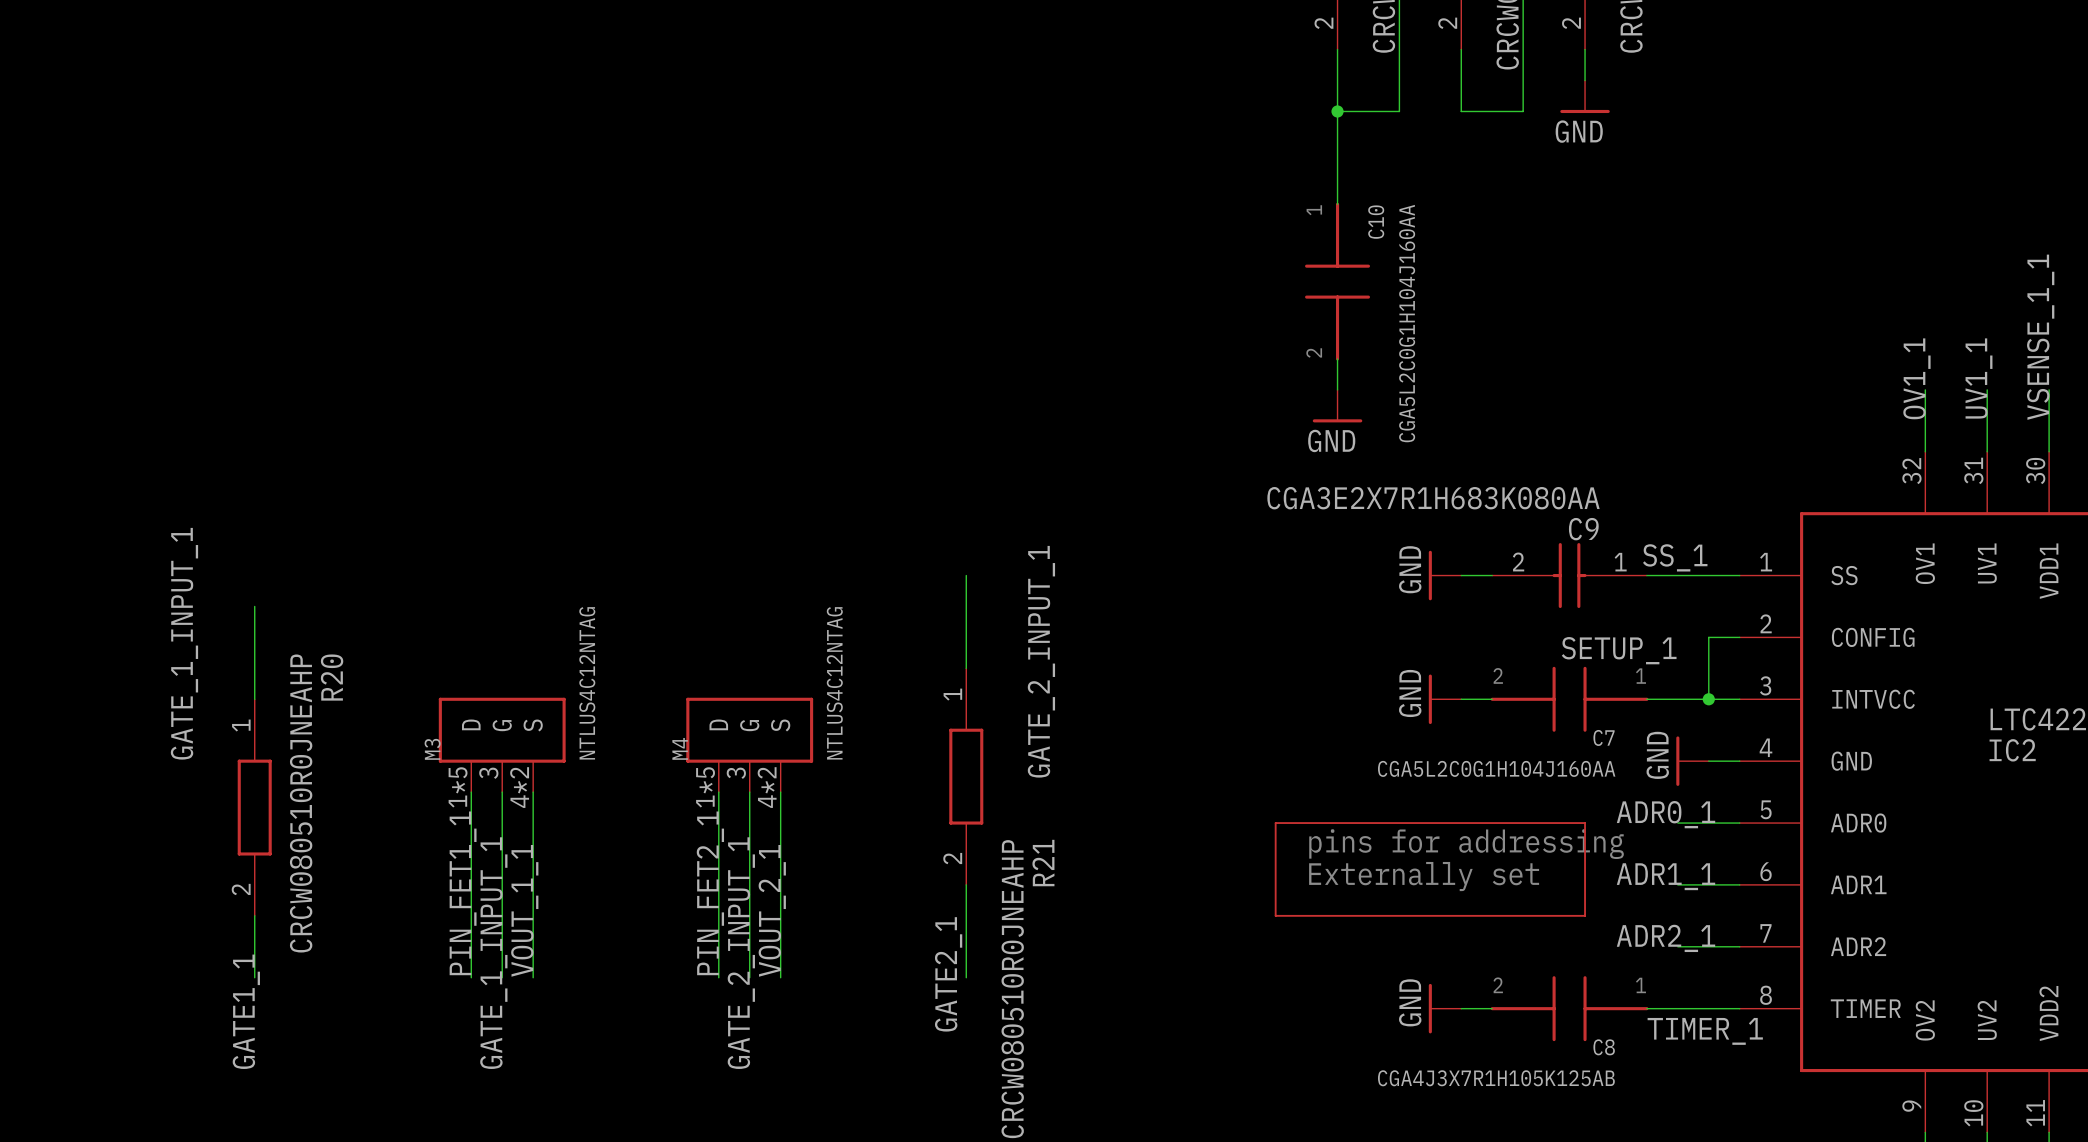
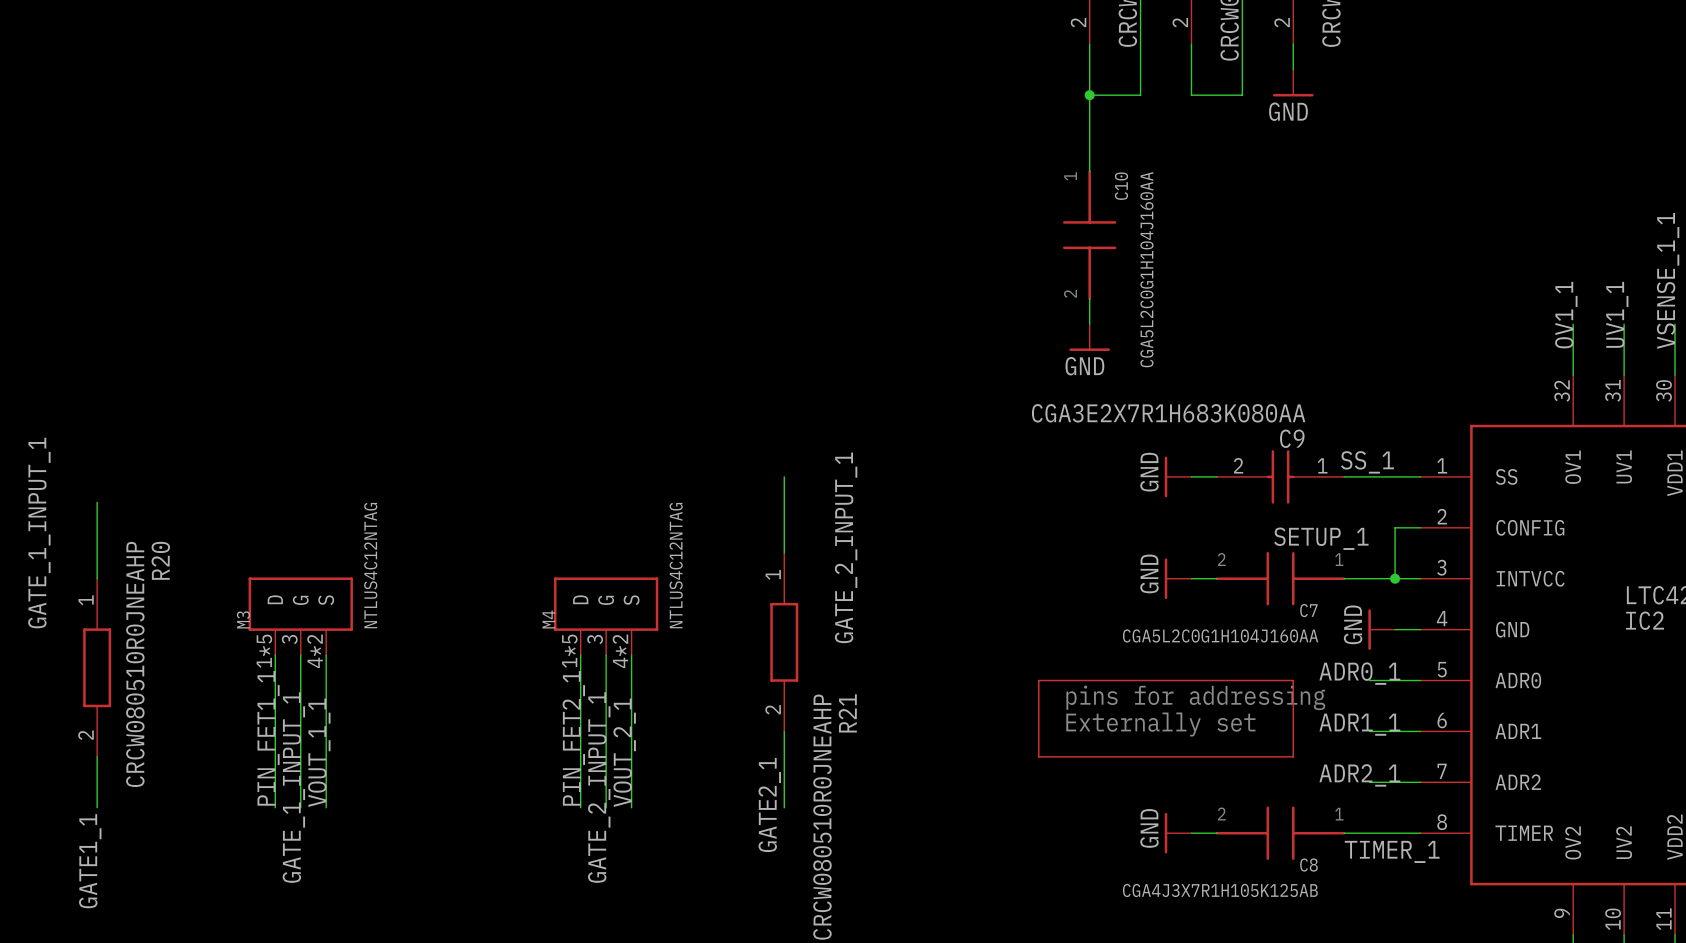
wire: (254, 606) (254, 699) -> (97, 502) (97, 578)
label position: GATE_1_INPUT_1 (184, 643) -> GATE_1_INPUT_1 (39, 533)
M3 position: (502, 744) -> (300, 616)
wire: (471, 792) (471, 977) -> (275, 655) (275, 807)
wire: (502, 792) (502, 977) -> (300, 655) (300, 807)
wire: (533, 792) (533, 977) -> (326, 655) (326, 807)
R20 position: (254, 807) -> (97, 667)
label position: PIN_FET1_1 (463, 893) -> PIN_FET1_1 (268, 738)
label position: VOUT_1_1 (524, 910) -> VOUT_1_1 (319, 752)
wire: (254, 915) (254, 977) -> (97, 756) (97, 807)
label position: GATE_1_INPUT_1 (493, 953) -> GATE_1_INPUT_1 (293, 787)
label position: GATE1_1 (246, 1011) -> GATE1_1 (90, 861)

